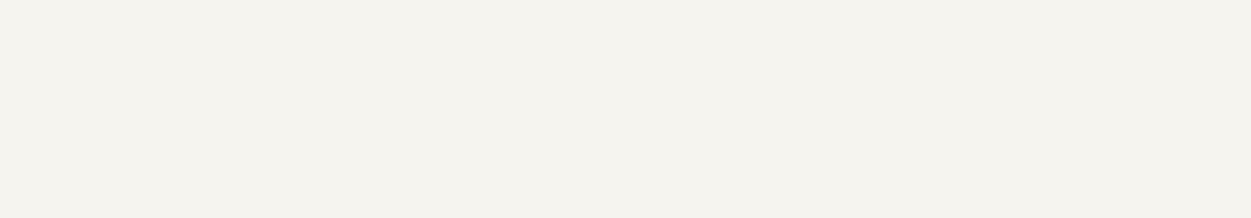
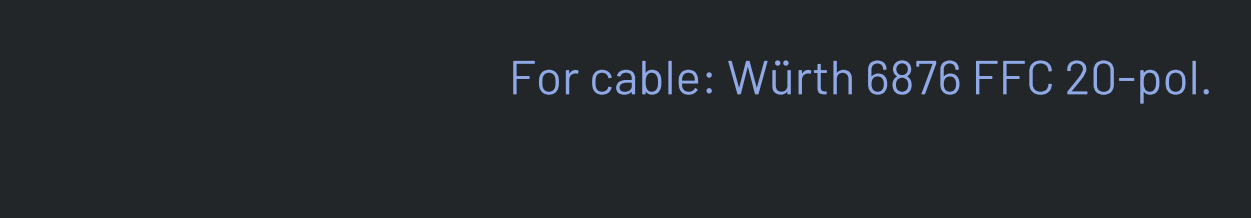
text: none -> For cable: Würth 6876 FFC 20-pol. (861, 82)

